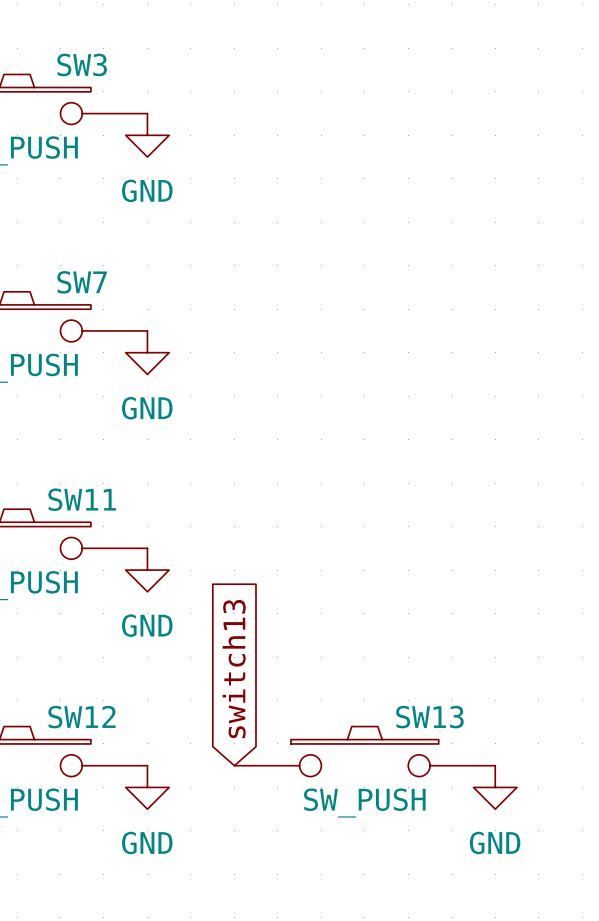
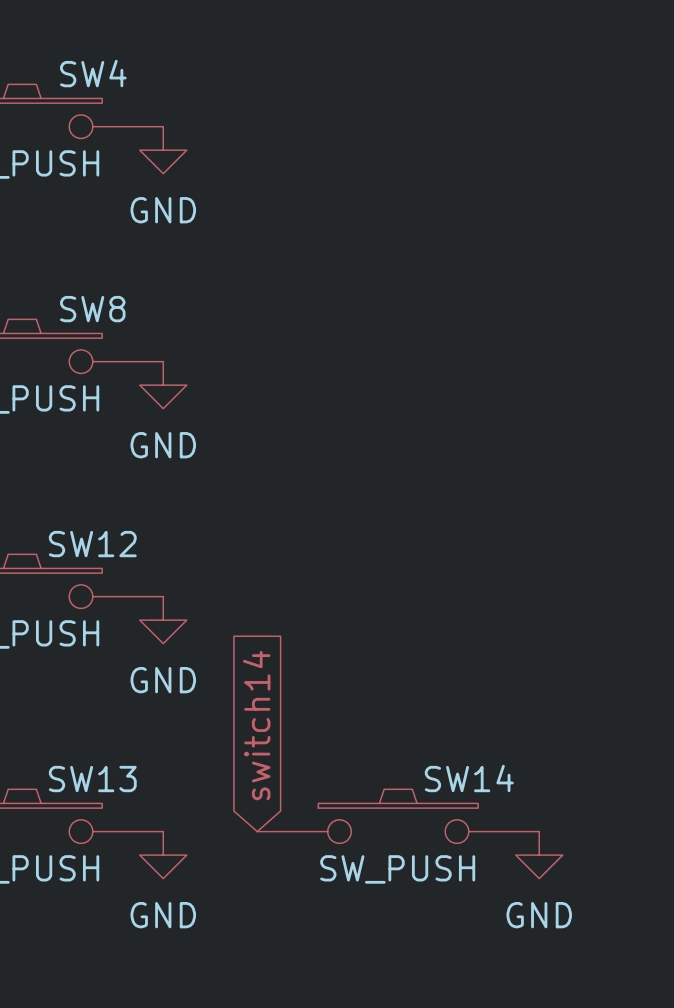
SW3 name: SW3 (82, 64) -> SW4 (93, 73)
SW7 name: SW7 (82, 282) -> SW8 (92, 309)
SW11 name: SW11 (82, 499) -> SW12 (92, 544)
global label: switch13 (234, 669) -> switch14 (256, 725)
SW12 name: SW12 (81, 717) -> SW13 (92, 779)
SW13 name: SW13 (429, 717) -> SW14 (469, 778)

